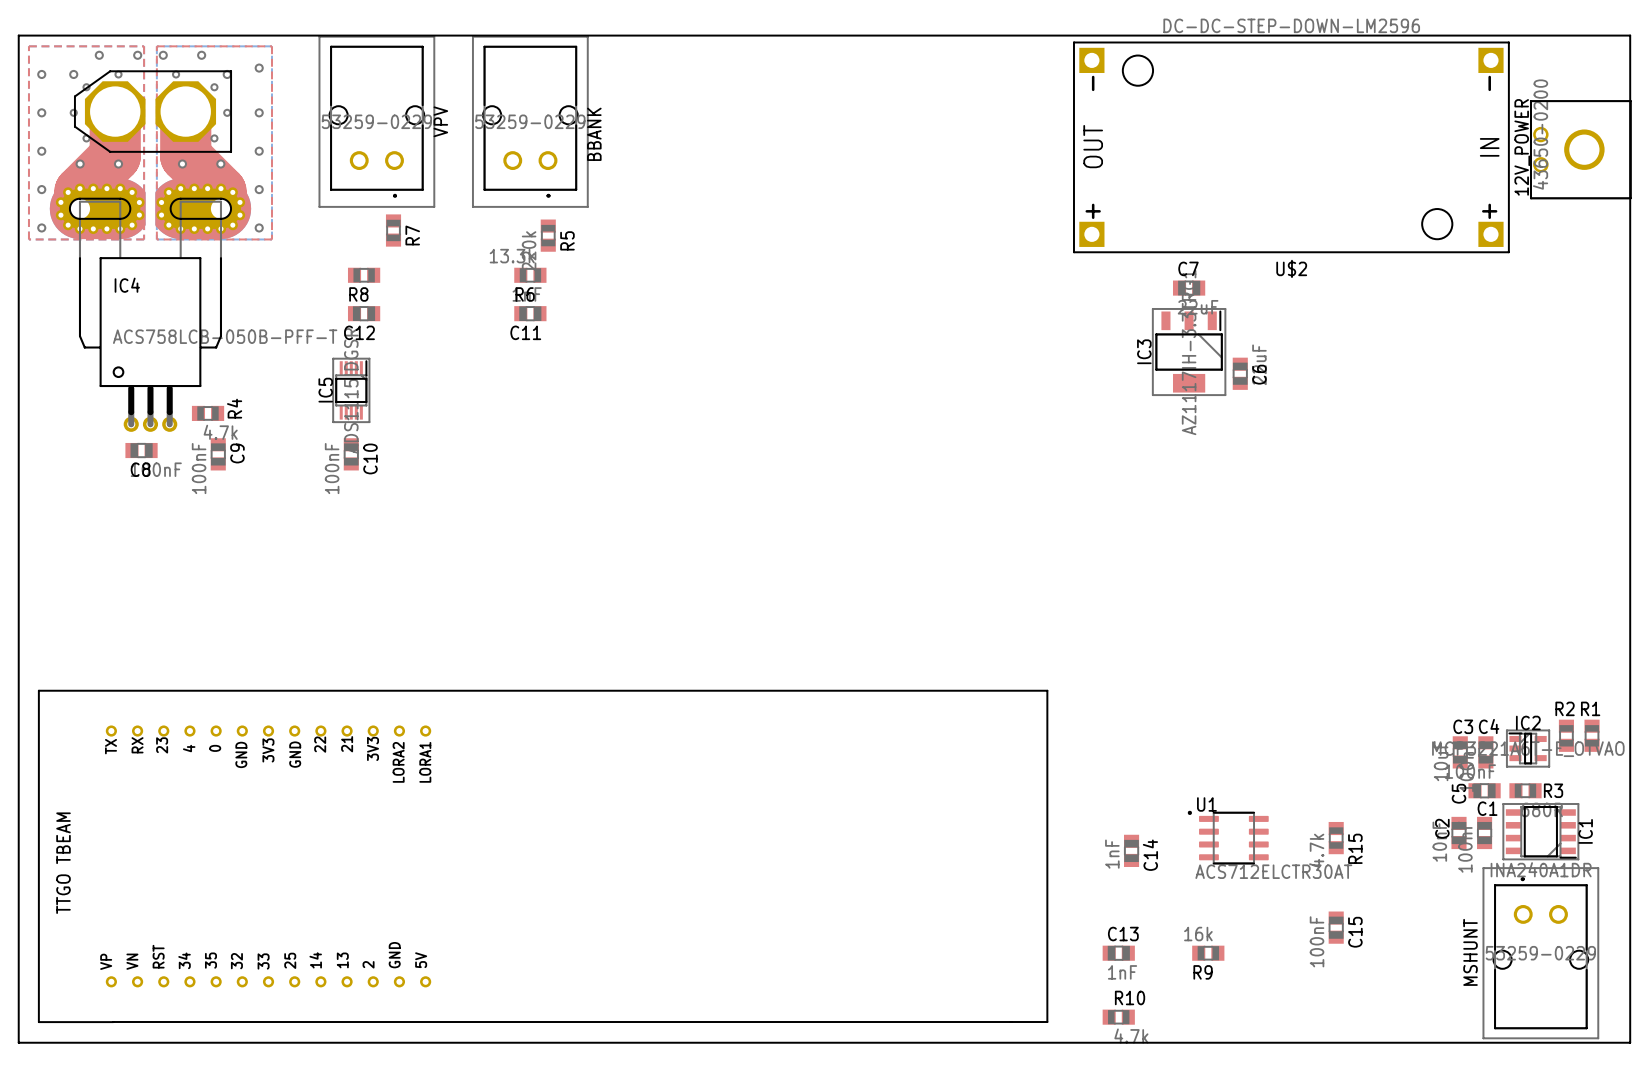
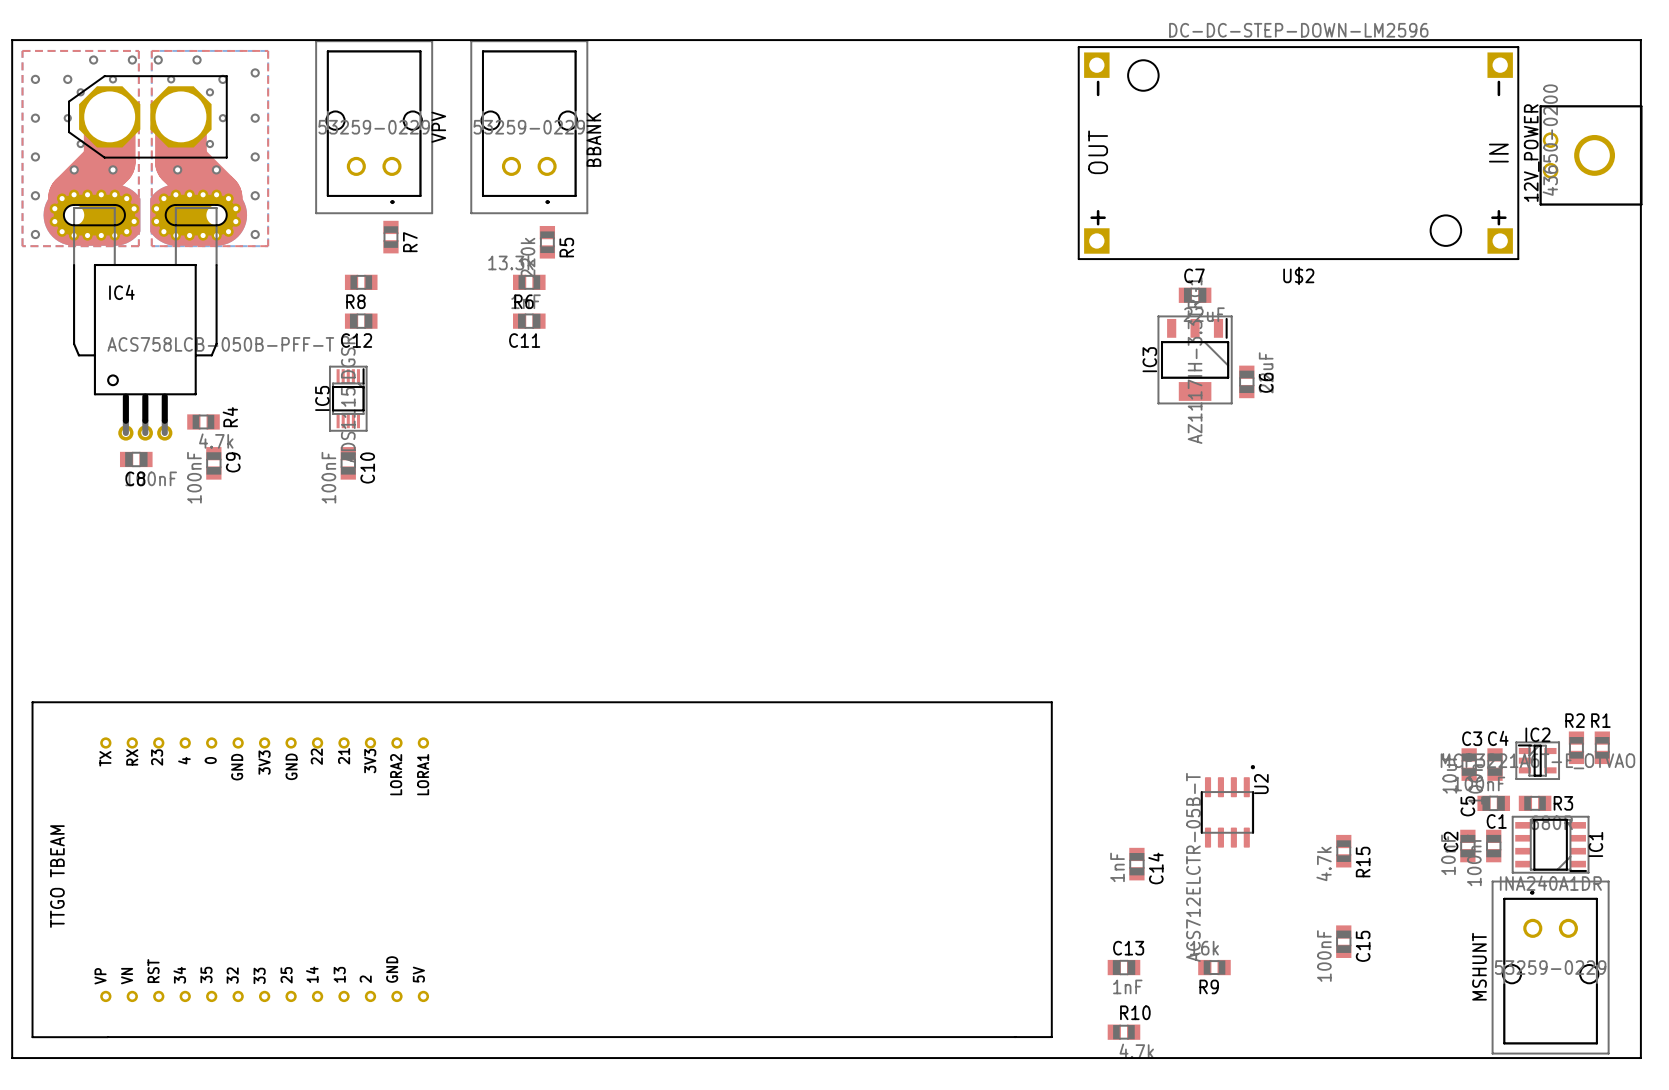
U2: none -> ACS712ELCTR-05B-T (1227, 806)
U1: ACS712ELCTR30AT (1228, 837) -> none

